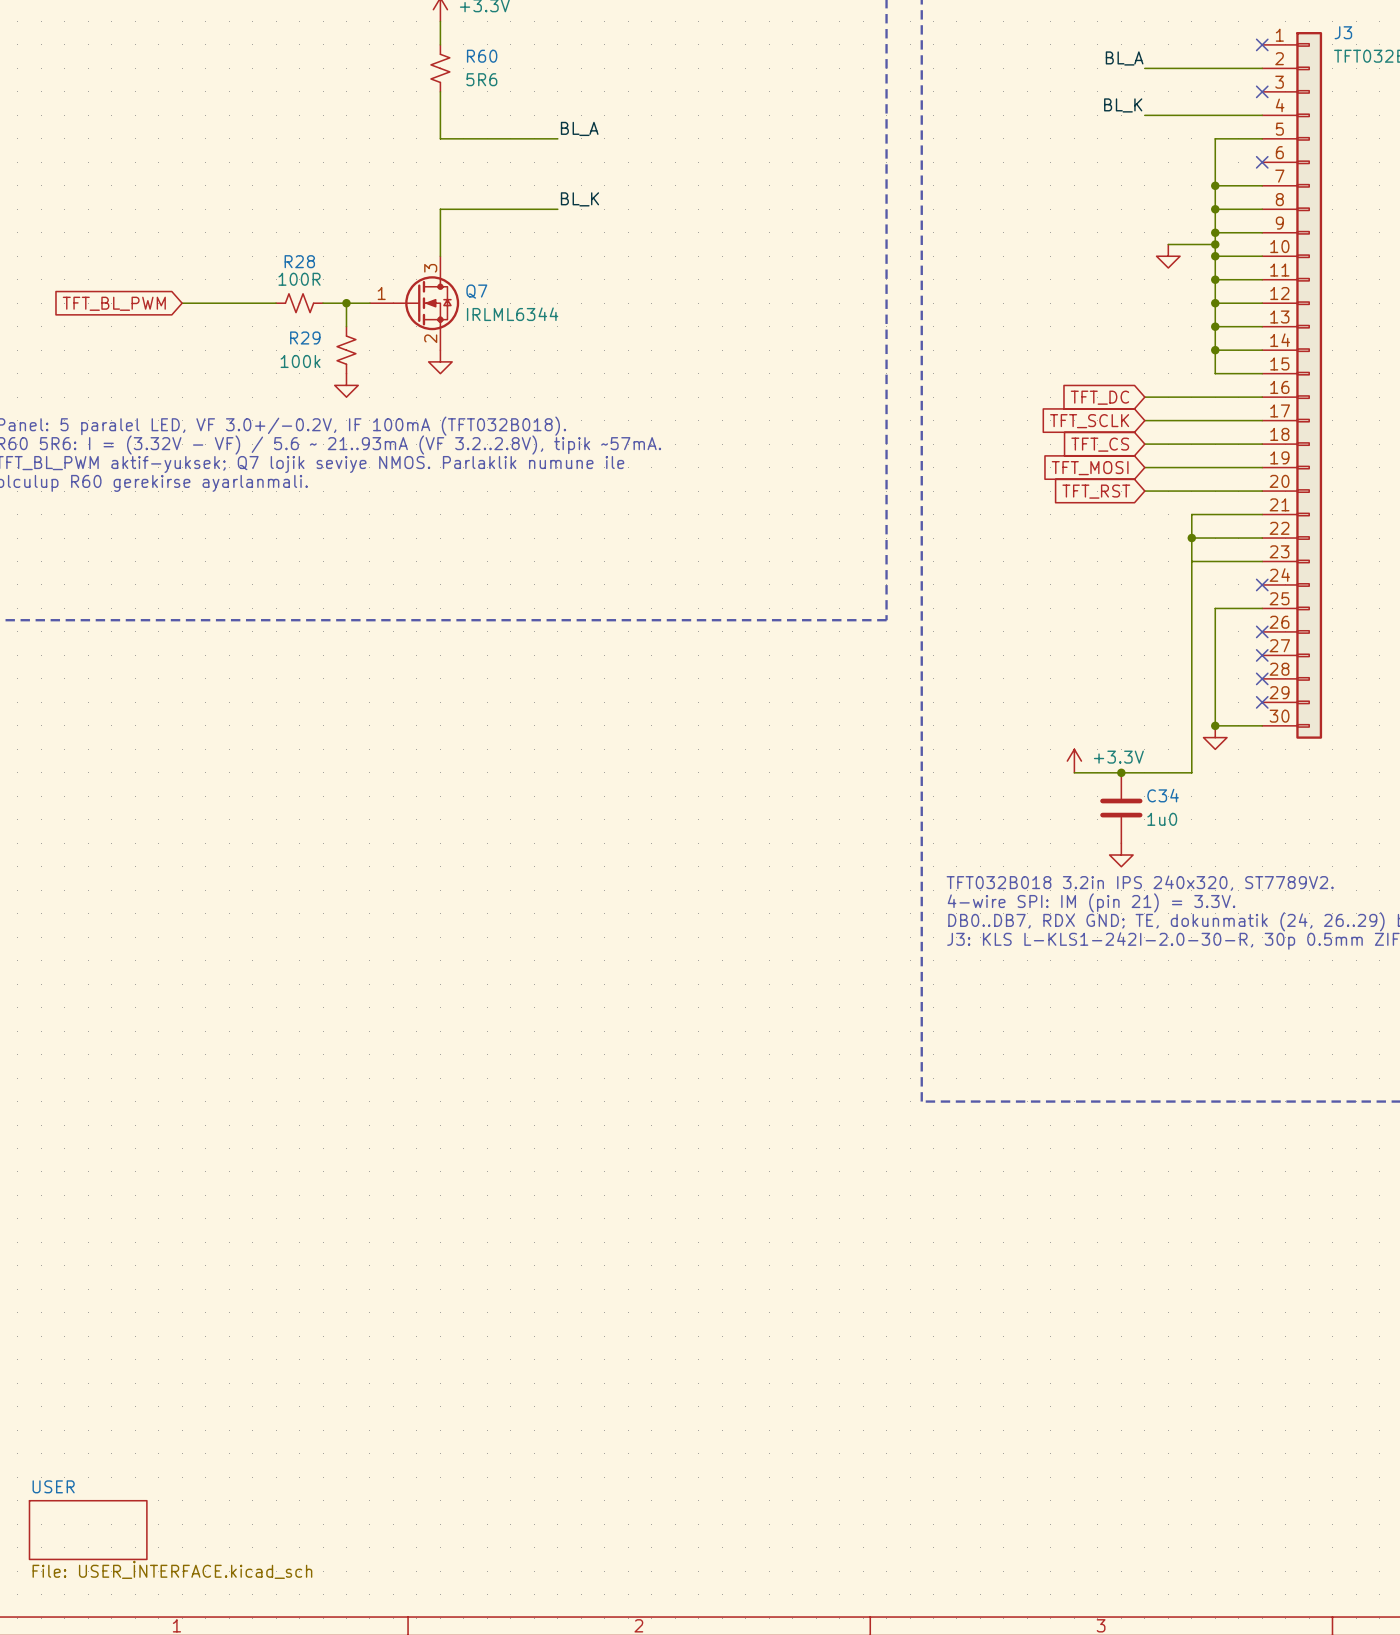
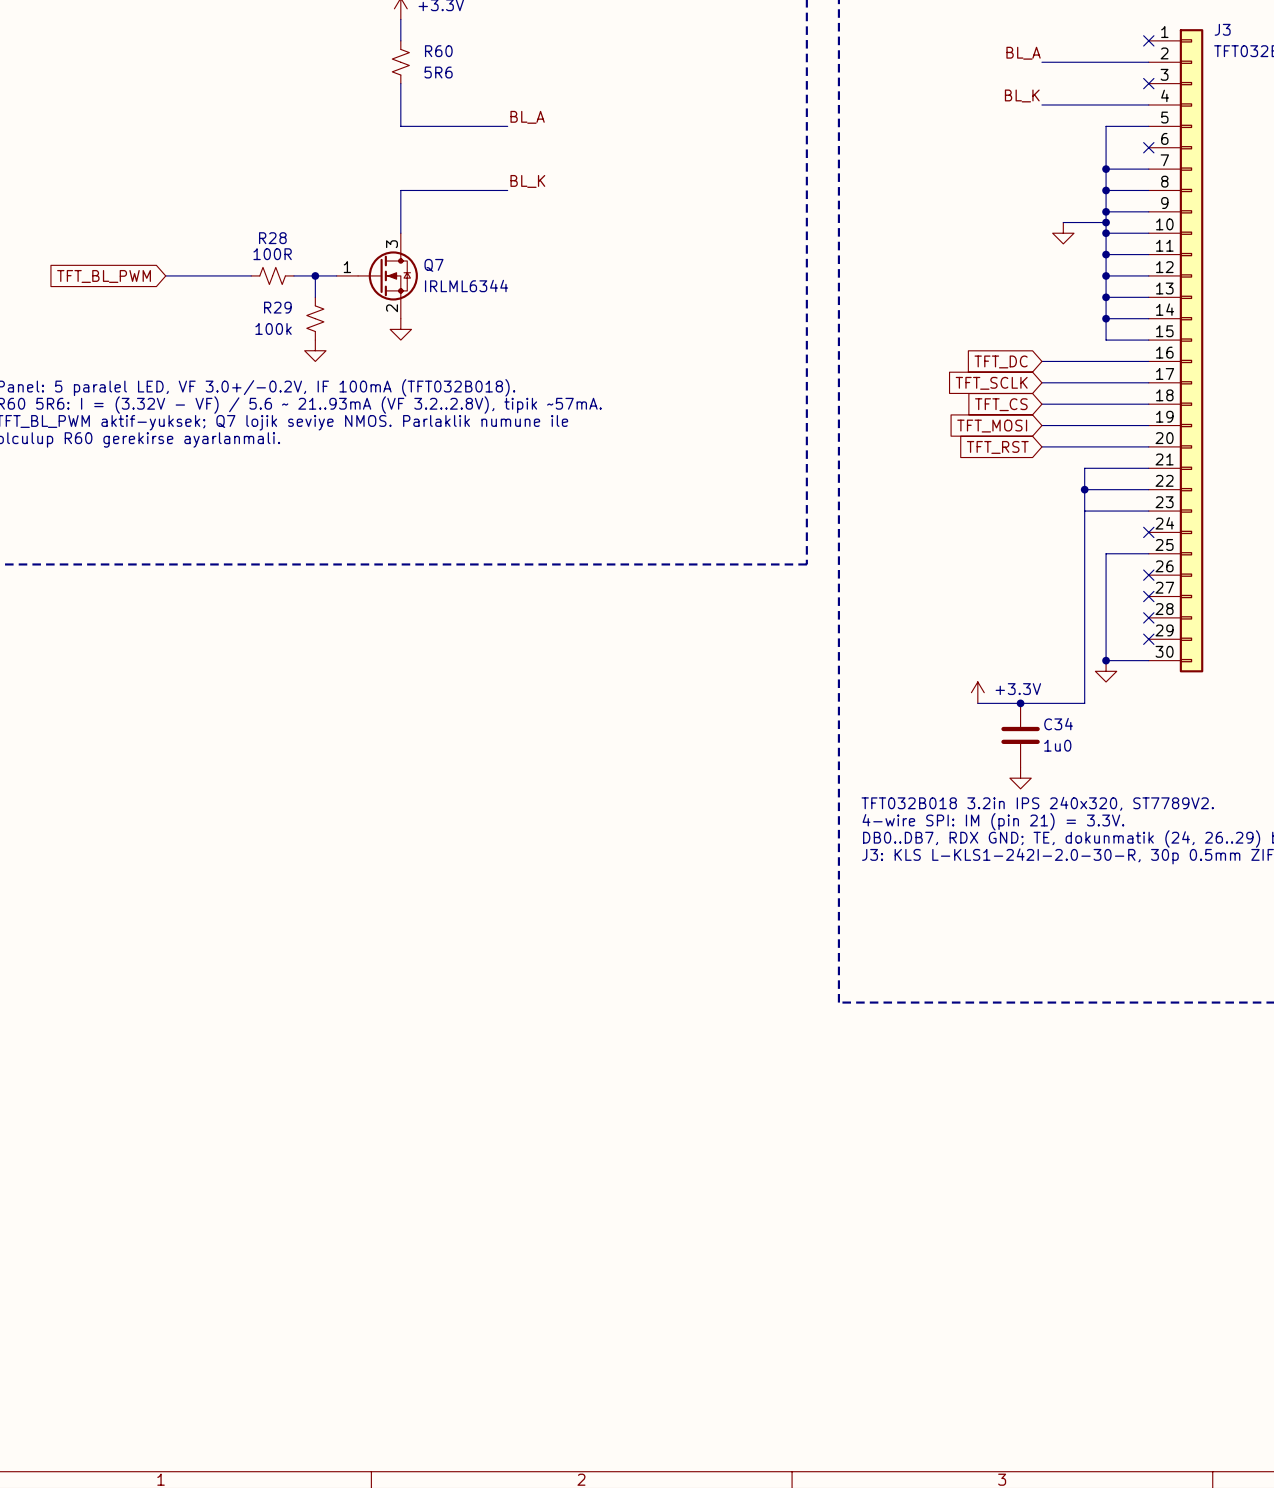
sheet USER: File: USER_İNTERFACE.kicad_sch (88, 1530) -> none

